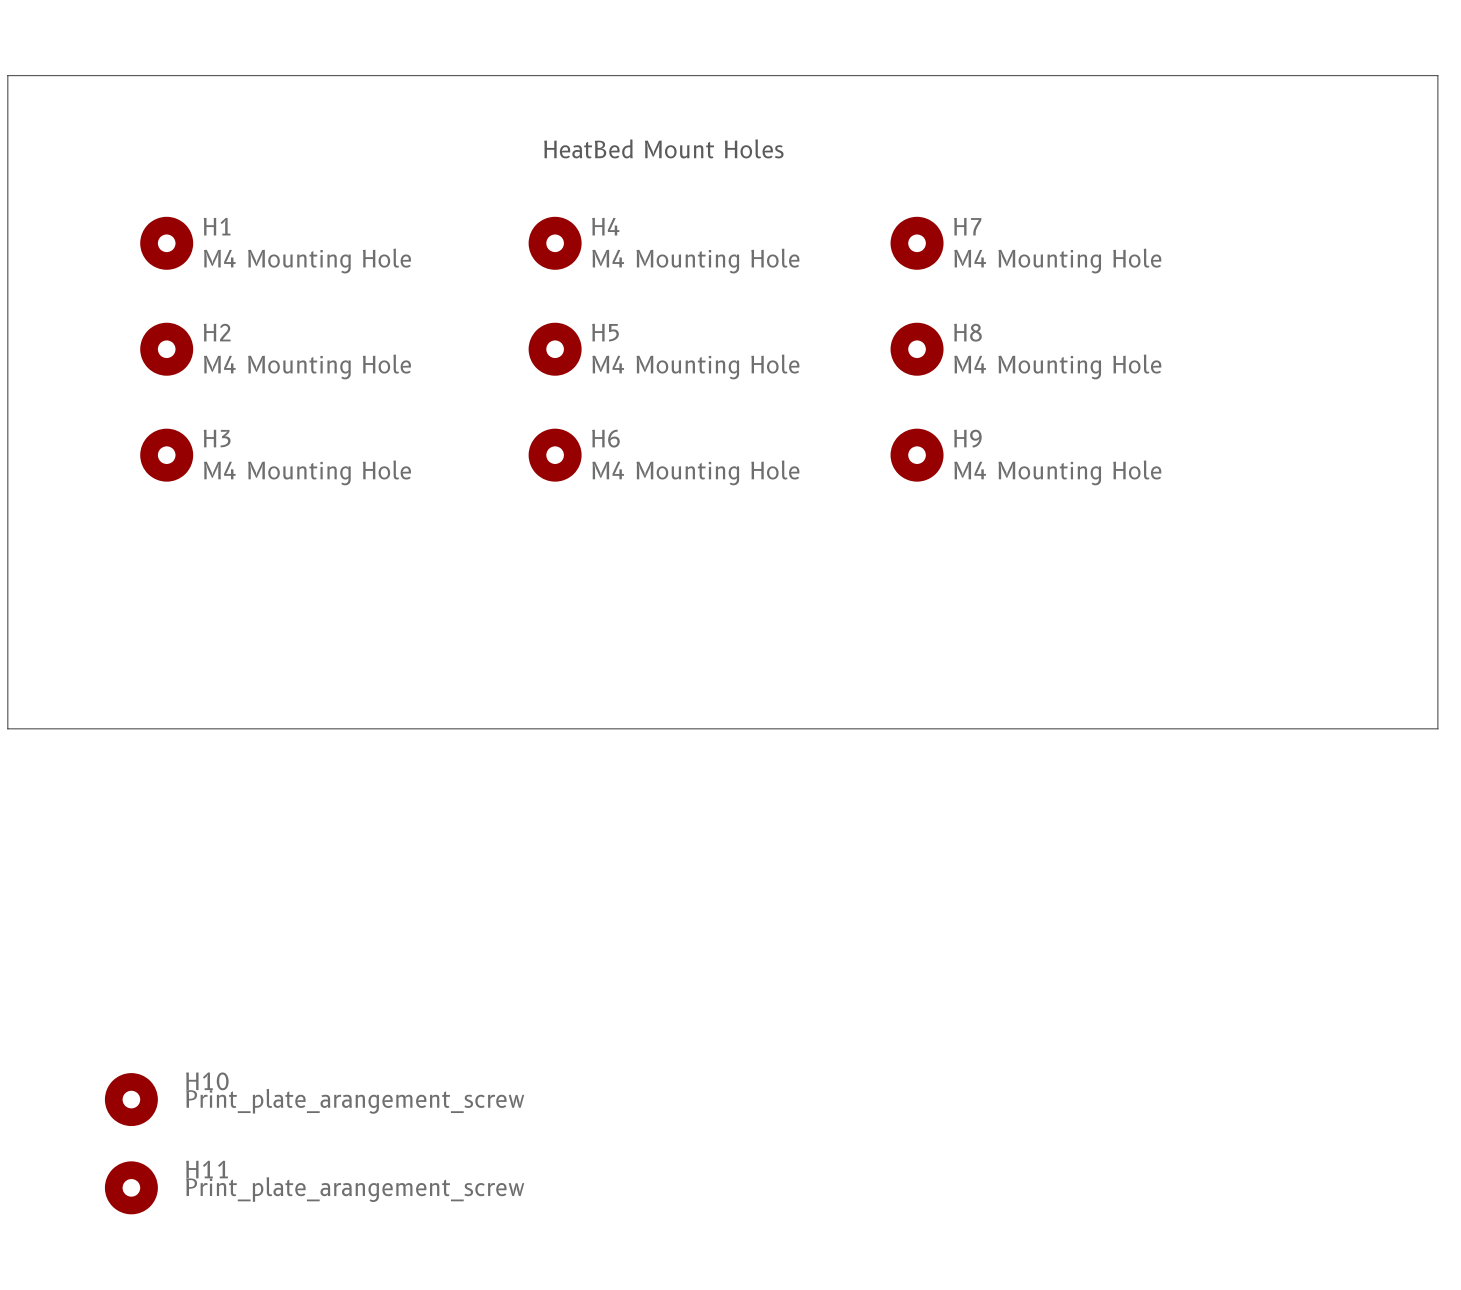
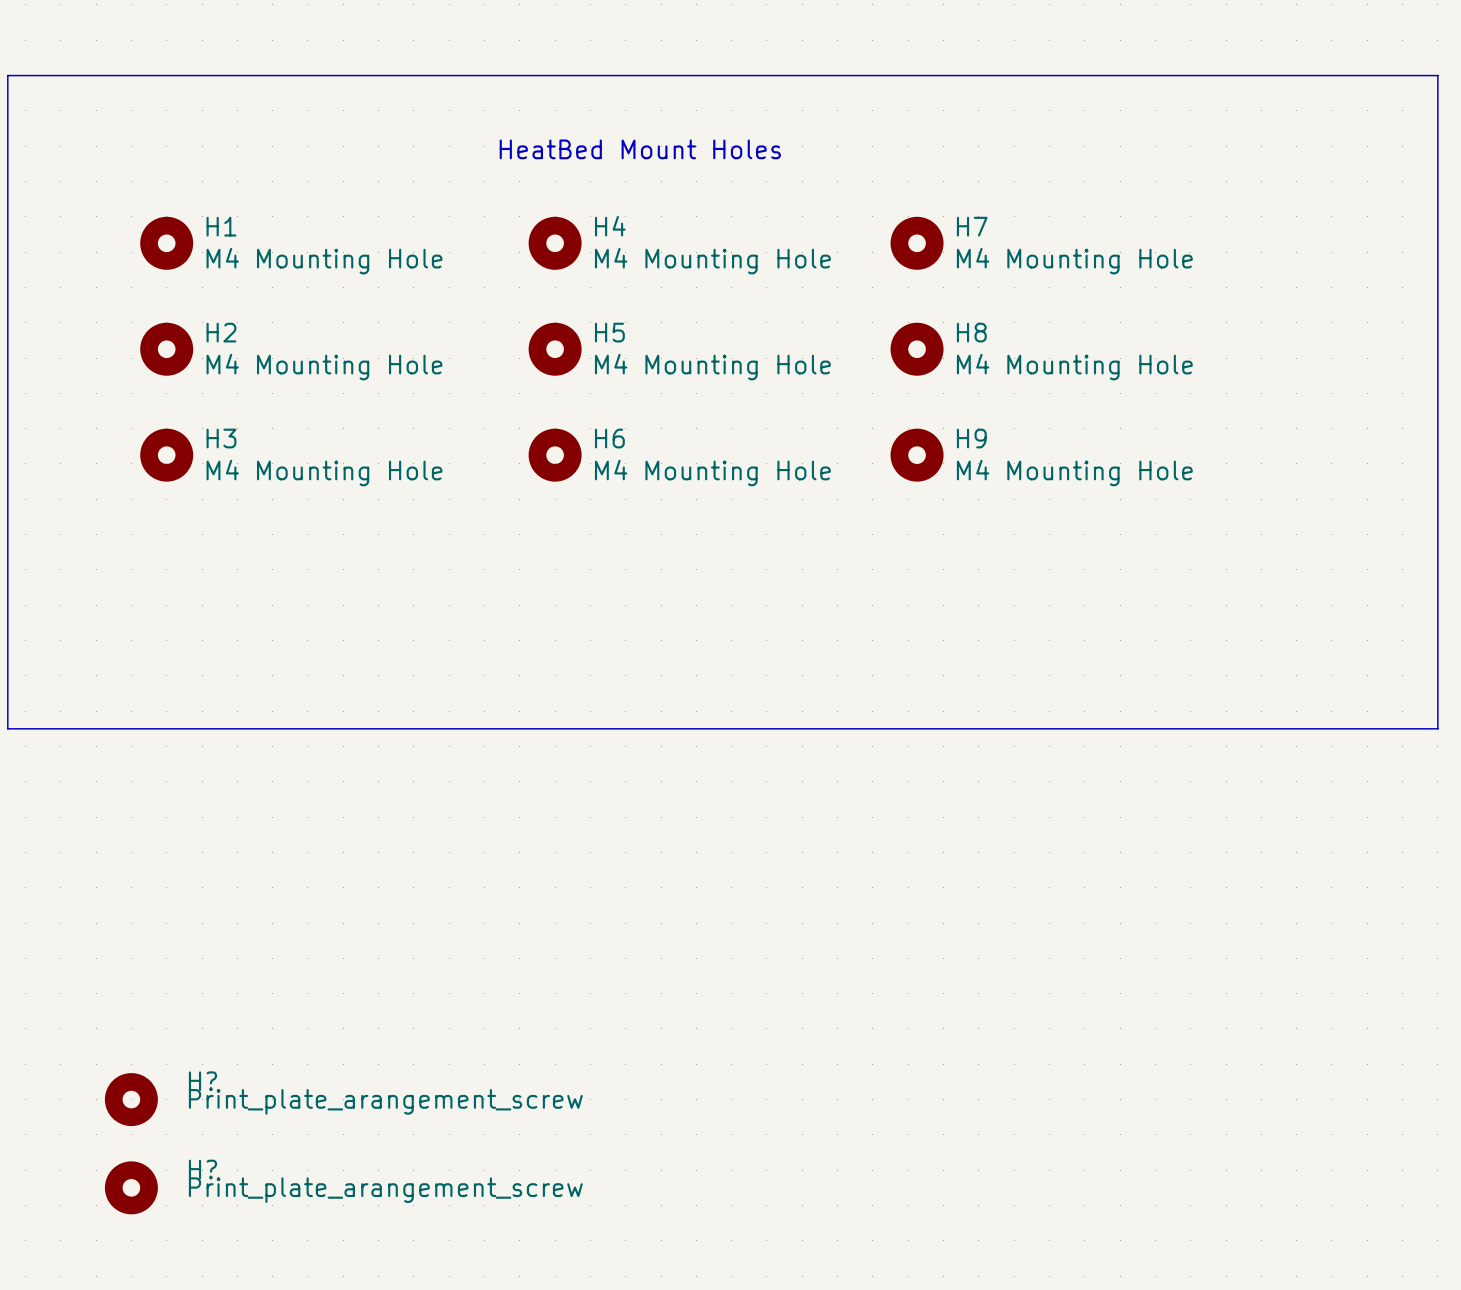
H10 name: H10 (207, 1081) -> H? (202, 1081)
H11 name: H11 (207, 1169) -> H? (202, 1169)

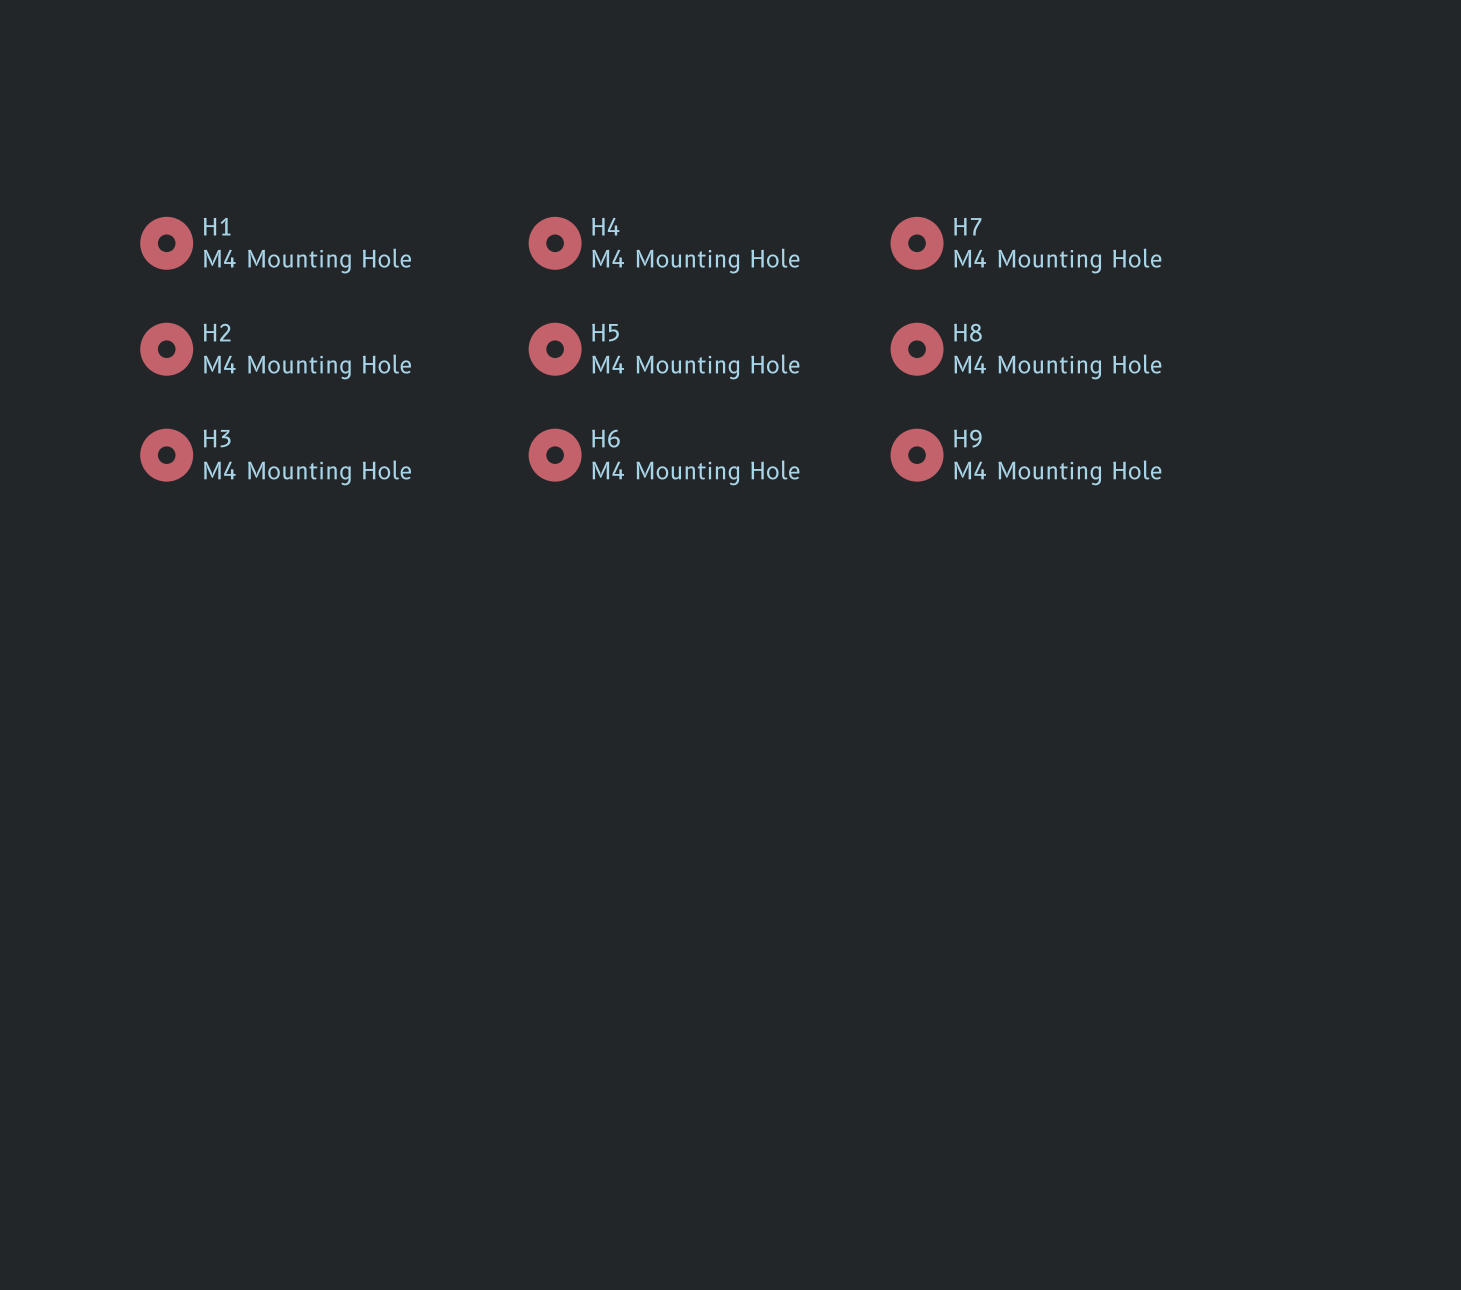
line: (7, 75) (7, 728) (1437, 728) (1437, 75) (7, 75) -> none
text: HeatBed Mount Holes (640, 149) -> none
H?: Print_plate_arangement_screw (131, 1099) -> none
H?: Print_plate_arangement_screw (131, 1187) -> none

